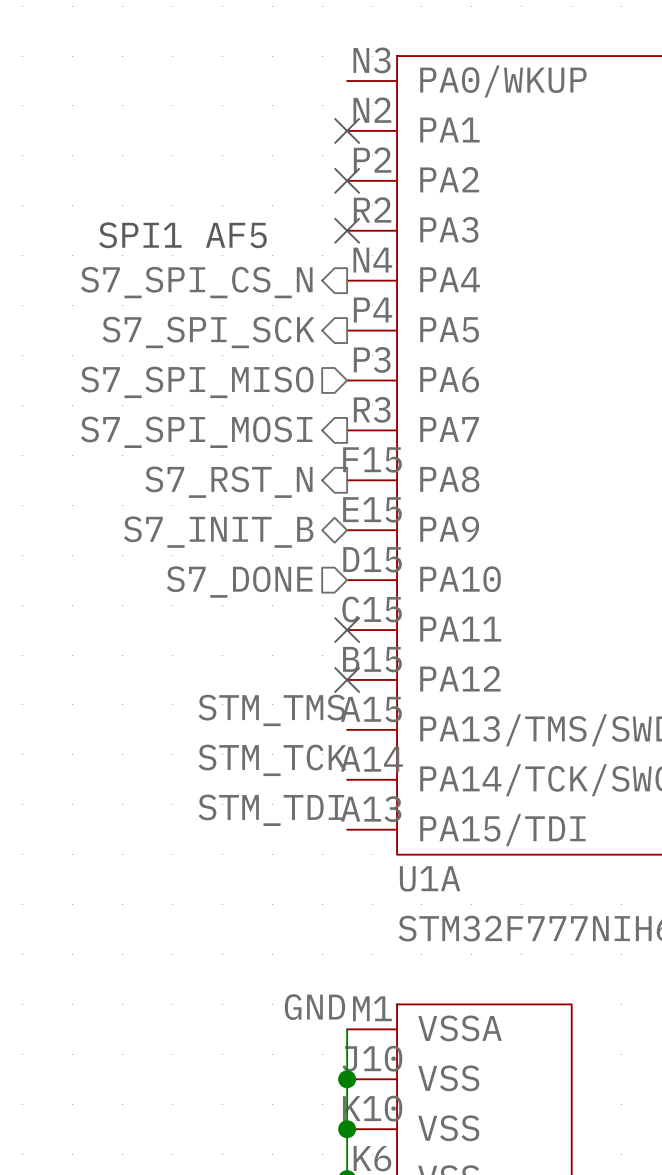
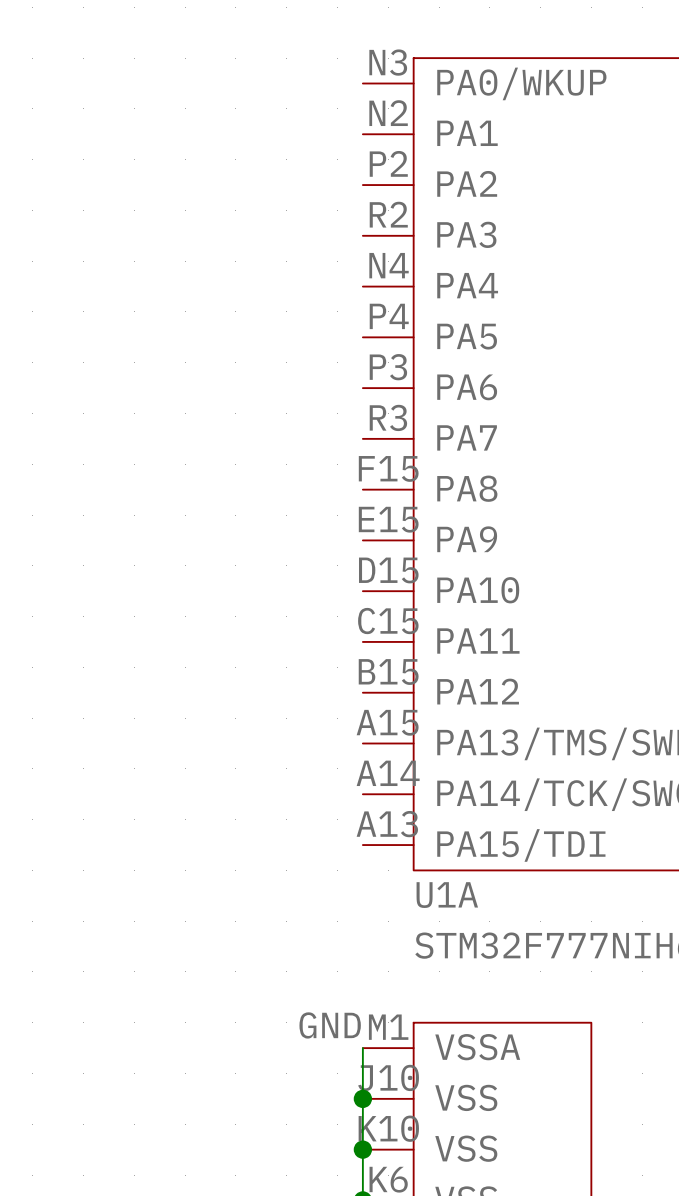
no-connect mark: (347, 130) -> none
no-connect mark: (347, 180) -> none
no-connect mark: (347, 230) -> none
text: SPI1 AF5 (182, 235) -> none
hierarchical label: S7_SPI_CS_N (196, 282) -> none
hierarchical label: S7_SPI_SCK (208, 332) -> none
hierarchical label: S7_SPI_MISO (197, 382) -> none
hierarchical label: S7_SPI_MOSI (196, 432) -> none
hierarchical label: S7_RST_N (228, 482) -> none
hierarchical label: S7_INIT_B (218, 532) -> none
hierarchical label: S7_DONE (239, 582) -> none
no-connect mark: (347, 630) -> none
no-connect mark: (347, 679) -> none
label: STM_TMS (271, 710) -> none
label: STM_TCK (272, 760) -> none
label: STM_TDI (271, 810) -> none

